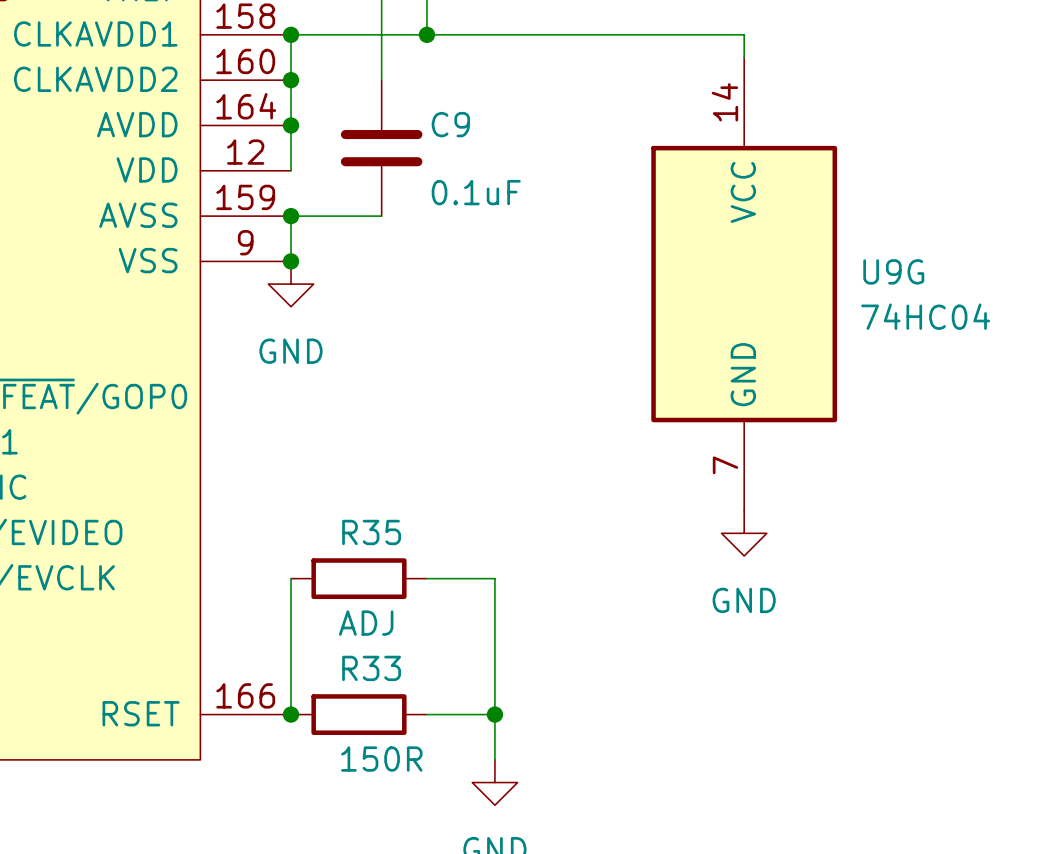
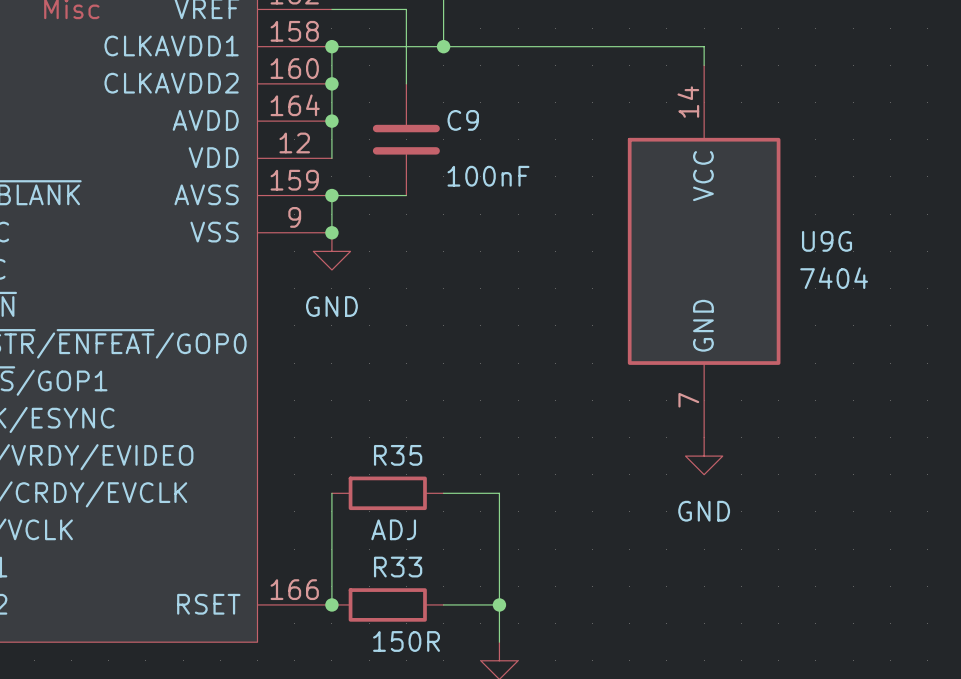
C9 value: 0.1uF (476, 192) -> 100nF (488, 176)
U9G value: 74HC04 (925, 316) -> 7404 (834, 278)

